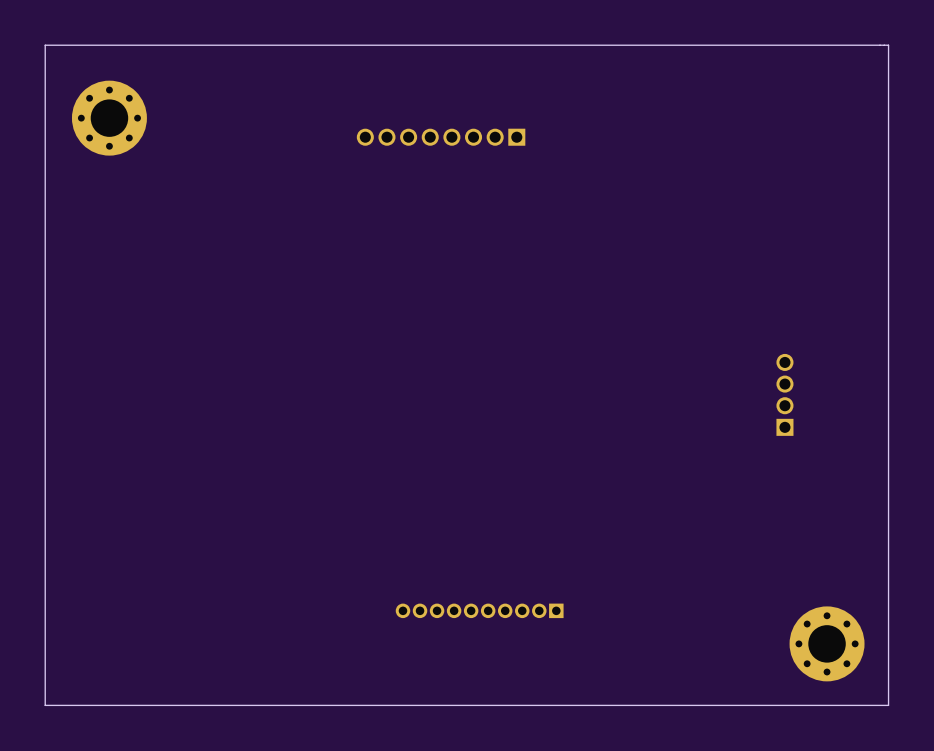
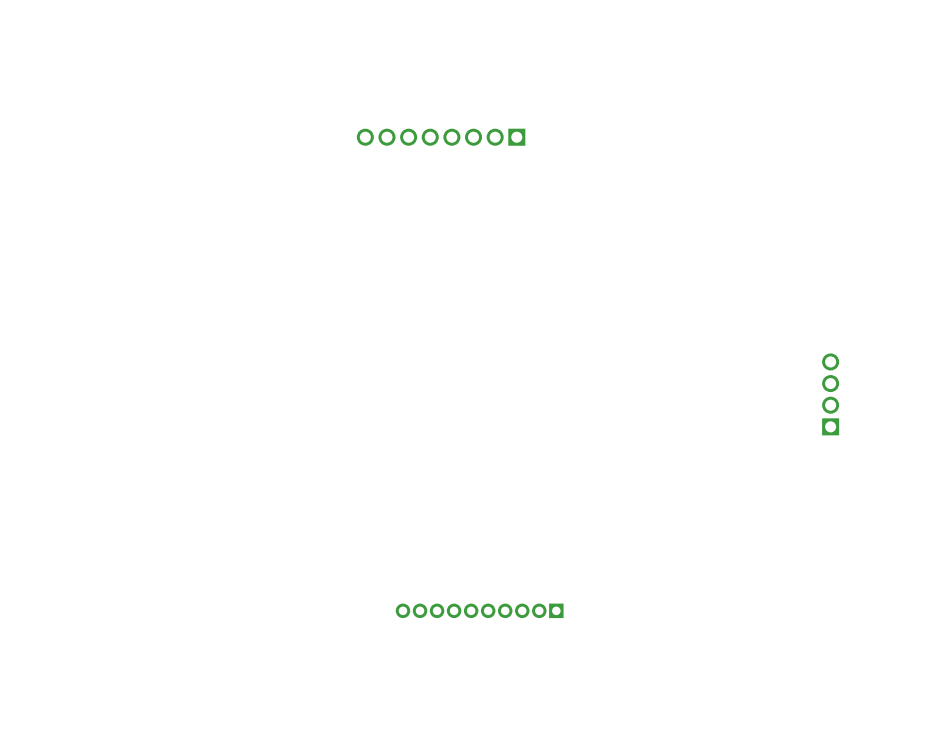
board edge: (888, 45) (888, 705) (45, 705) (45, 45) (888, 45) -> none
part: (109, 118) -> none
part position: (784, 394) -> (830, 394)
part: (827, 643) -> none

